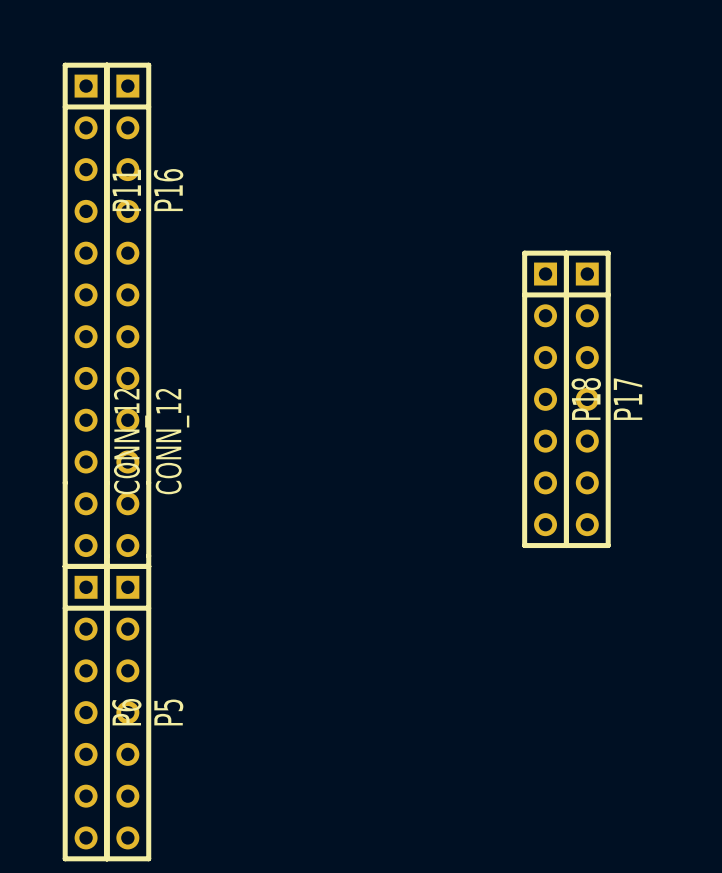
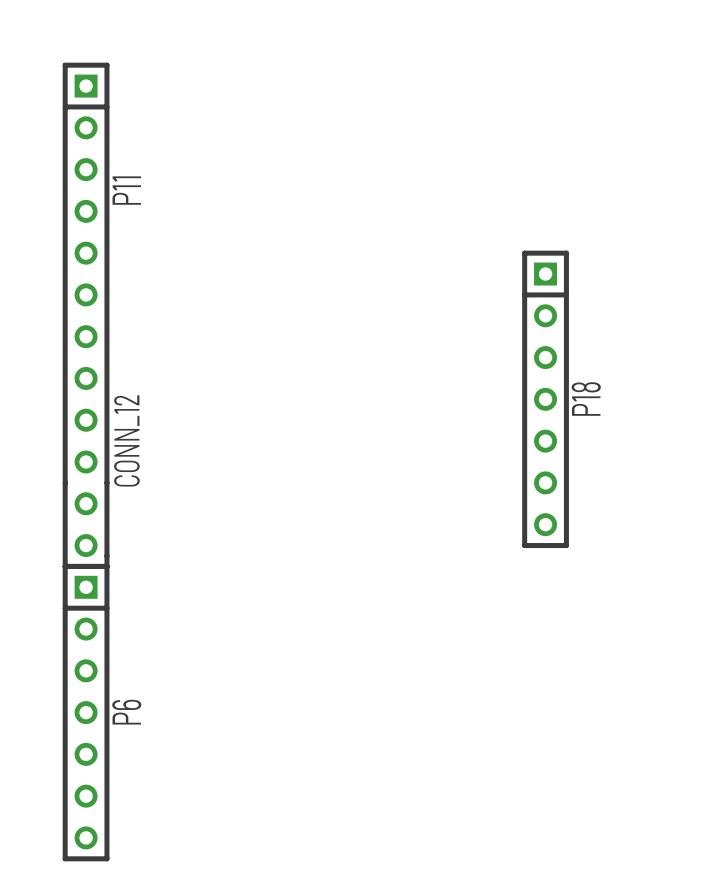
P16: CONN_12 (127, 315) -> none
P17: (587, 399) -> none
P5: (127, 712) -> none

